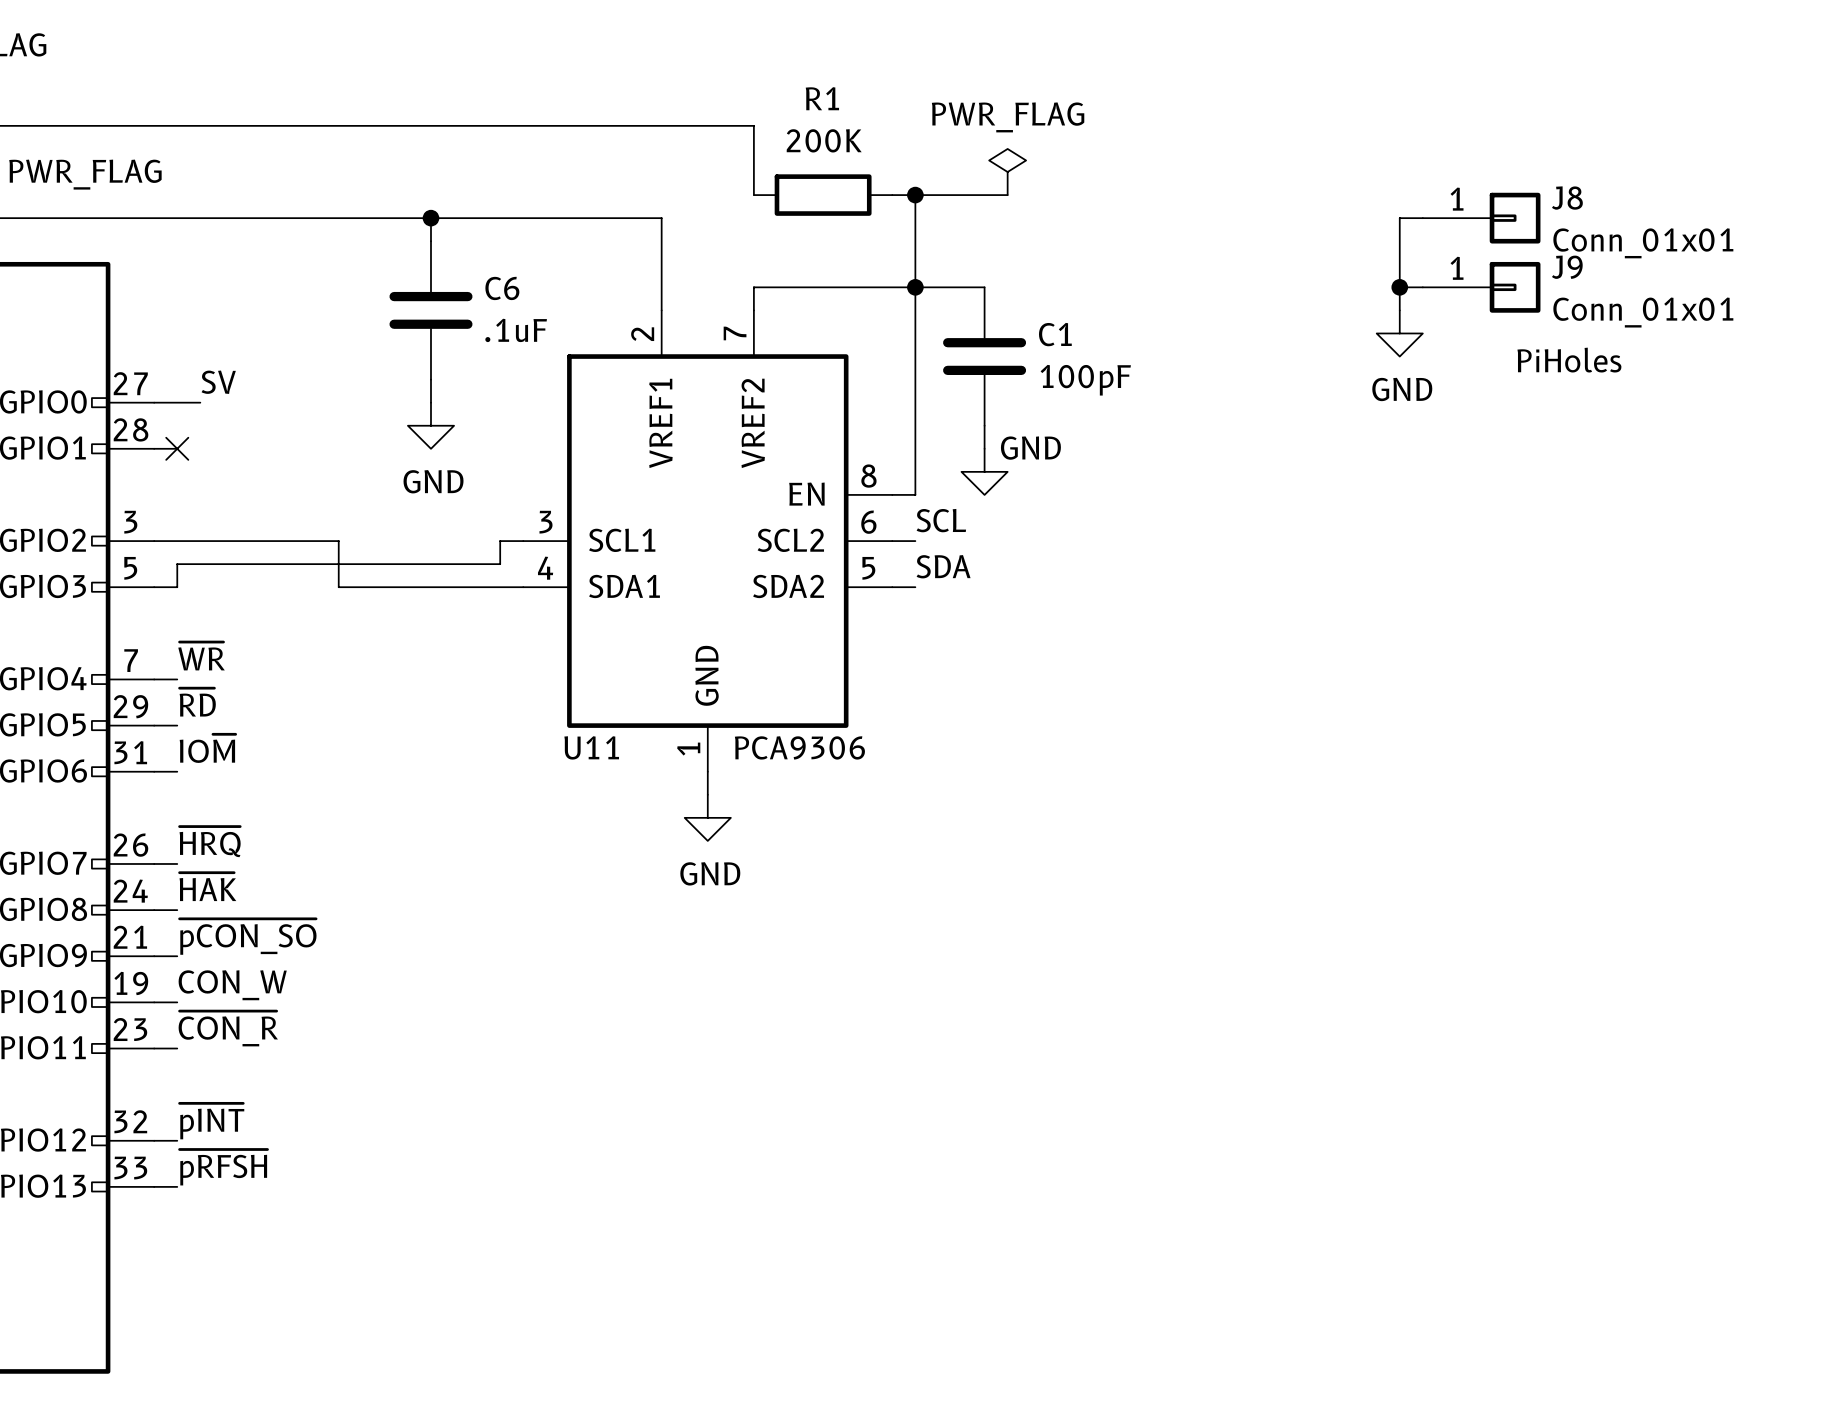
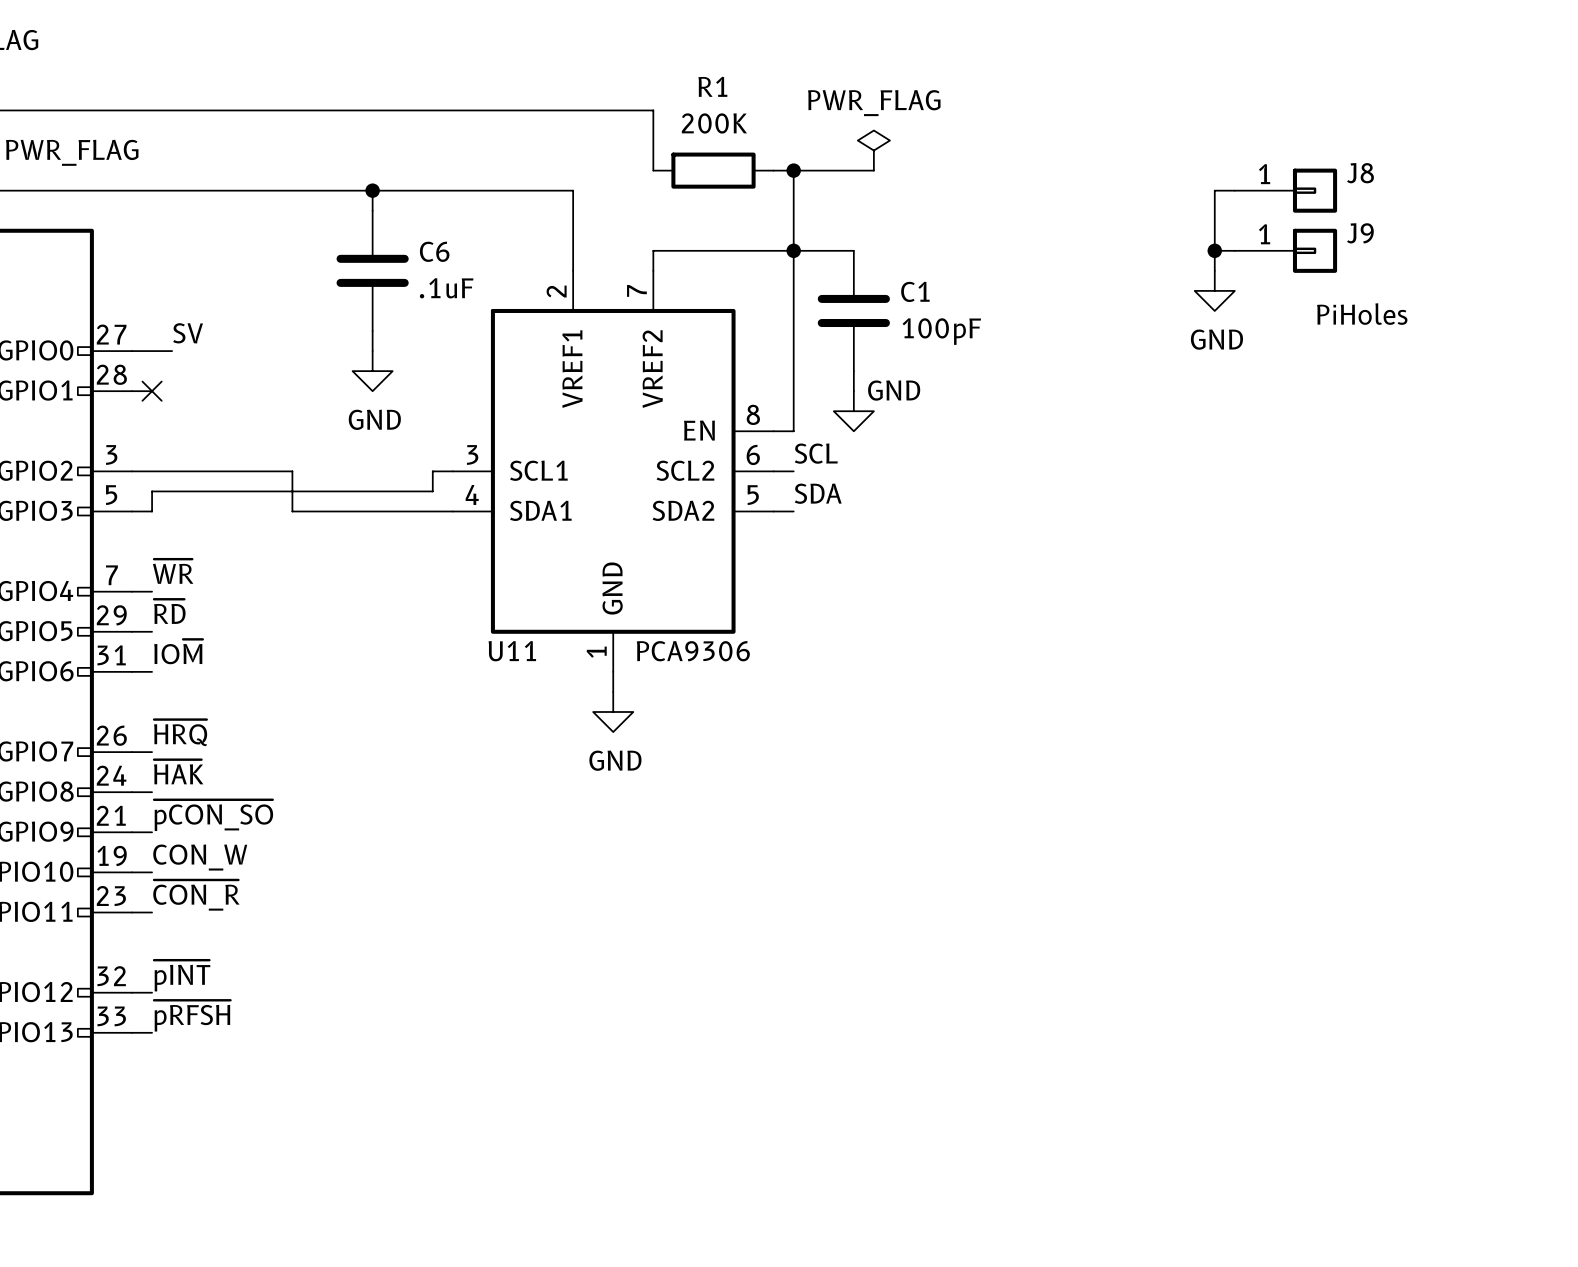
J8 value: Conn_01x01 (1643, 243) -> none
J9 value: Conn_01x01 (1643, 312) -> none

